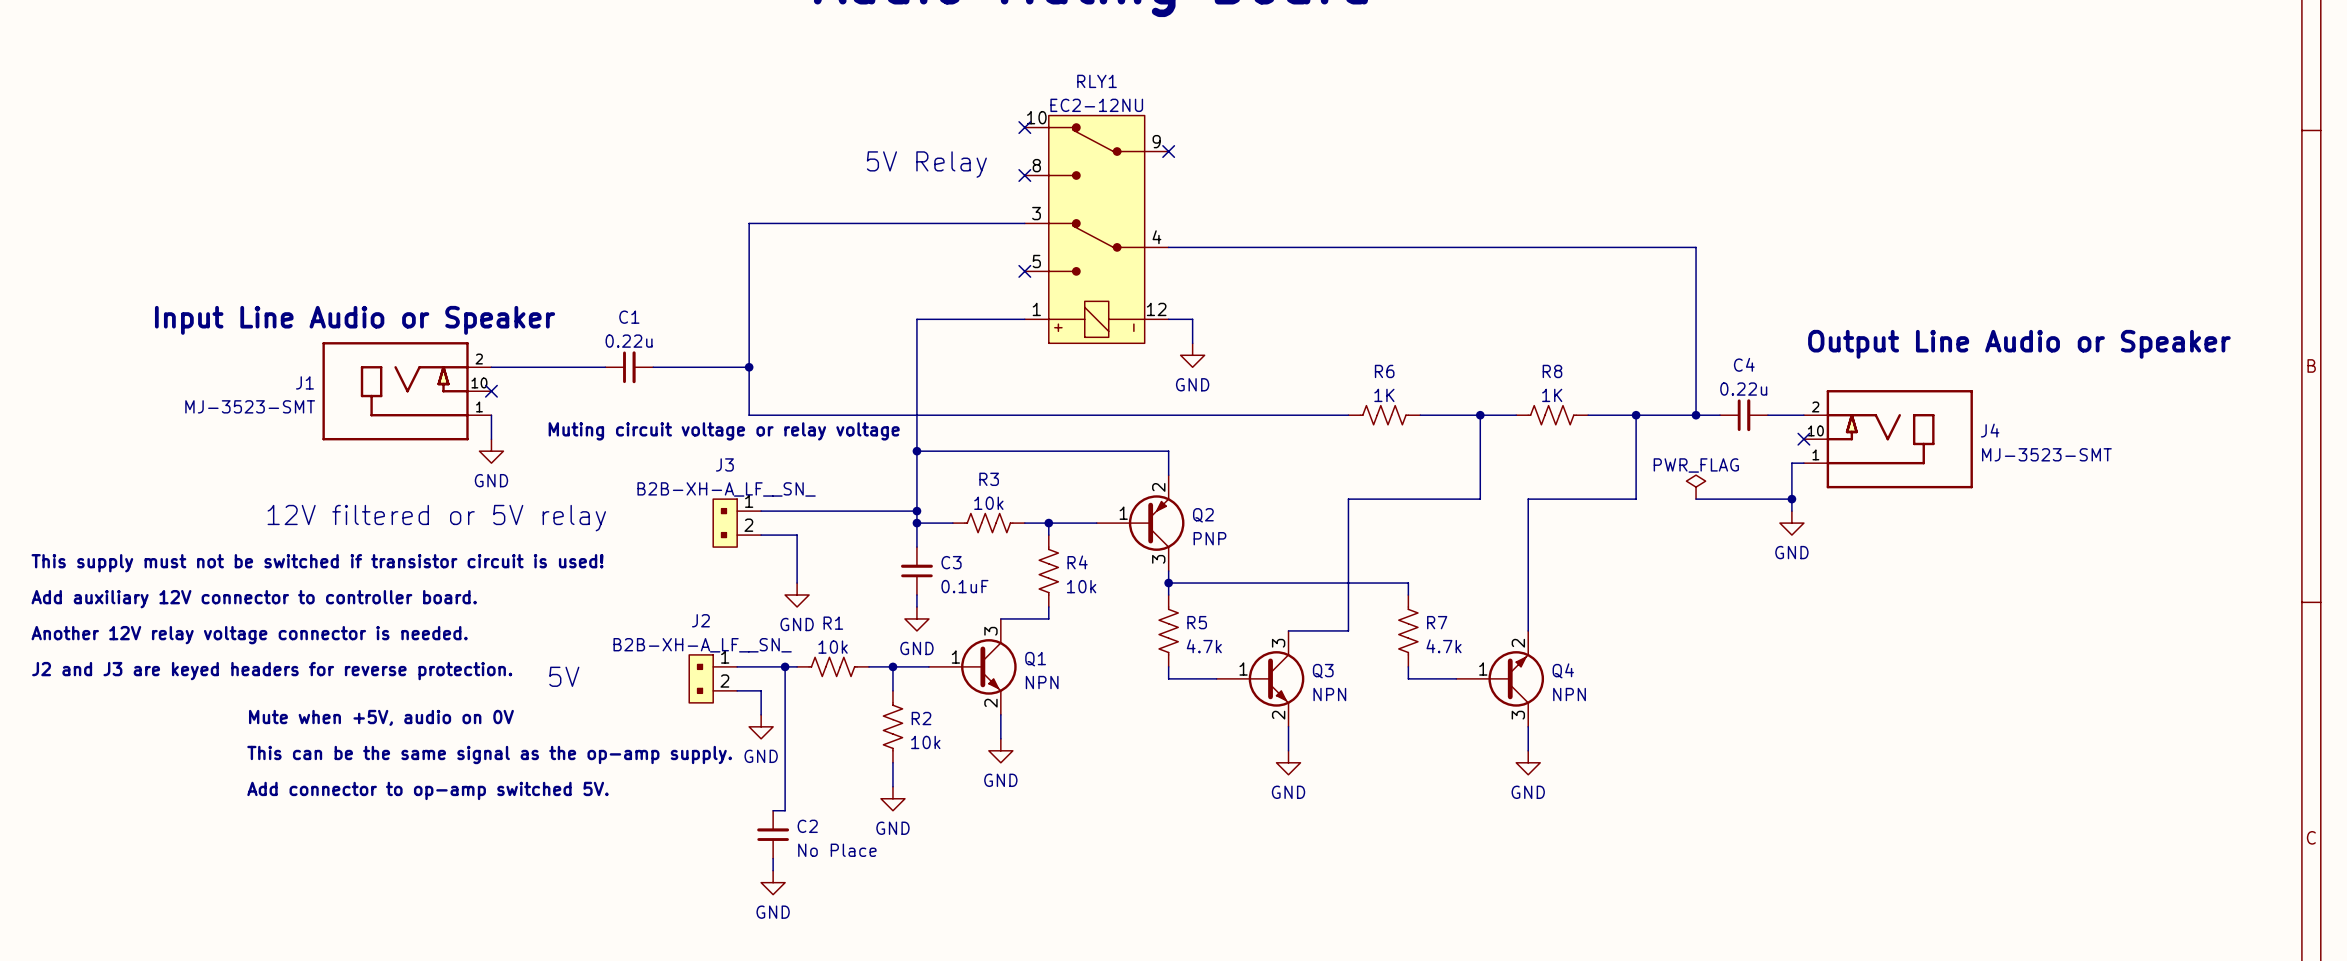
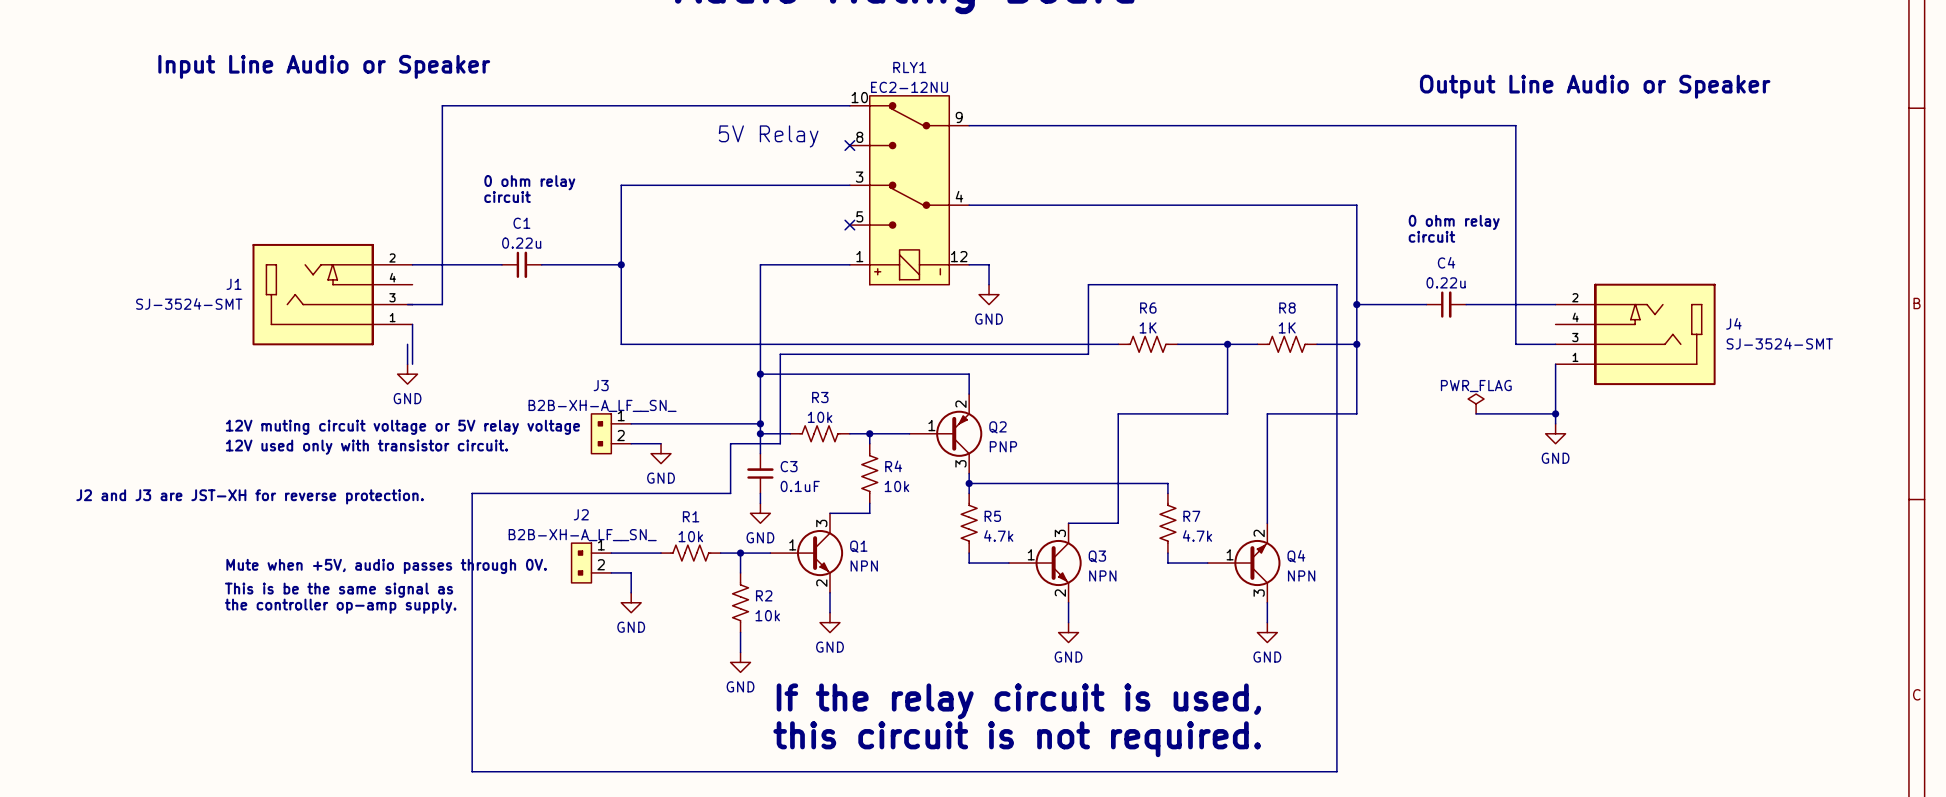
text: none -> Input Line Audio or Speaker (324, 66)
text: none -> Output Line Audio or Speaker (1595, 86)
no-connect mark: (1024, 127) -> none
wire: none -> (969, 125) (1515, 125) (1515, 344) (1555, 344)
no-connect mark: (1168, 151) -> none
text: none -> 0 ohm relay (529, 182)
text: none -> circuit (507, 197)
wire: (1636, 247) (1696, 247) (1696, 415) -> (1356, 205) (1356, 344)
text: none -> 0 ohm relay (1454, 222)
text: none -> circuit (1431, 236)
wire: none -> (412, 264) (501, 264)
text: Input Line Audio or Speaker (355, 320) -> none
J1 symbol: [322, 342, 492, 441] -> [252, 243, 413, 346]
line: none -> (1088, 284) (1336, 284) (1336, 771) (472, 771) (472, 493) (730, 493) (730, 443) (780, 443) (780, 354) (1088, 354) (1088, 284)
text: Output Line Audio or Speaker (2019, 344) -> none
wire: (533, 367) (605, 367) -> (442, 304) (442, 105) (849, 105)
C1 position: (629, 367) -> (521, 264)
wire: (653, 367) (749, 367) -> (541, 264) (621, 264)
junction position: (749, 367) -> (621, 264)
junction: none -> (1356, 304)
wire: none -> (1466, 304) (1555, 304)
J4 symbol: [1803, 390, 1973, 489] -> [1555, 283, 1716, 386]
no-connect mark: (491, 391) -> none
wire: none -> (412, 324) (412, 364)
J1 value: MJ-3523-SMT (250, 406) -> SJ-3524-SMT (189, 303)
wire: (1636, 415) (1720, 415) -> (1356, 304) (1426, 304)
junction: (1696, 415) -> none
C4 position: (1743, 415) -> (1446, 304)
wire: (1767, 415) (1803, 415) -> none
text: Muting circuit voltage or relay voltage (724, 431) -> none
no-connect mark: (1803, 439) -> none
wire: none -> (1555, 364) (1555, 423)
J4 value: MJ-3523-SMT (2046, 454) -> SJ-3524-SMT (1779, 343)
wire: (1803, 463) (1791, 463) (1791, 511) -> none
power symbol position: PWR_FLAG (1696, 487) -> PWR_FLAG (1476, 403)
wire: (1696, 499) (1779, 499) -> (1486, 413) (1555, 413)
junction: (1791, 499) -> none
junction: none -> (1555, 413)
text: 12V filtered or 5V relay (436, 518) -> 12V muting circuit voltage or 5V relay voltage (402, 427)
power symbol position: GND (1791, 523) -> GND (1555, 433)
wire: (797, 535) (797, 583) -> none
text: none -> 12V used only with transistor circuit. (366, 447)
text: This supply must not be switched if transistor circuit is used! (317, 563) -> none
power symbol position: GND (797, 595) -> GND (661, 453)
text: Add auxiliary 12V connector to controller board. (254, 599) -> none
text: none -> J2 and J3 are JST-XH for reverse protection. (250, 496)
text: Another 12V relay voltage connector is needed. (249, 635) -> none
wire: (785, 666) (785, 810) (773, 810) -> none
junction: (785, 666) -> none
text: J2 and J3 are keyed headers for reverse protection. (272, 671) -> none
text: 5V (564, 676) -> none
text: none -> Mute when +5V, audio passes through 0V. (386, 566)
text: none -> This is be the same signal as (339, 590)
text: Mute when +5V, audio on 0V (381, 717) -> none
text: none -> the controller op-amp supply. (340, 606)
text: This can be the same signal as the op-amp supply. (489, 754) -> none
text: Add connector to op-amp switched 5V. (427, 790) -> none
C2: No Place (773, 834) -> none
text: none -> If the relay circuit is used, (1018, 701)
wire: (773, 858) (773, 870) -> none
power symbol: GND (773, 882) -> none
text: none -> this circuit is not required. (1017, 739)

